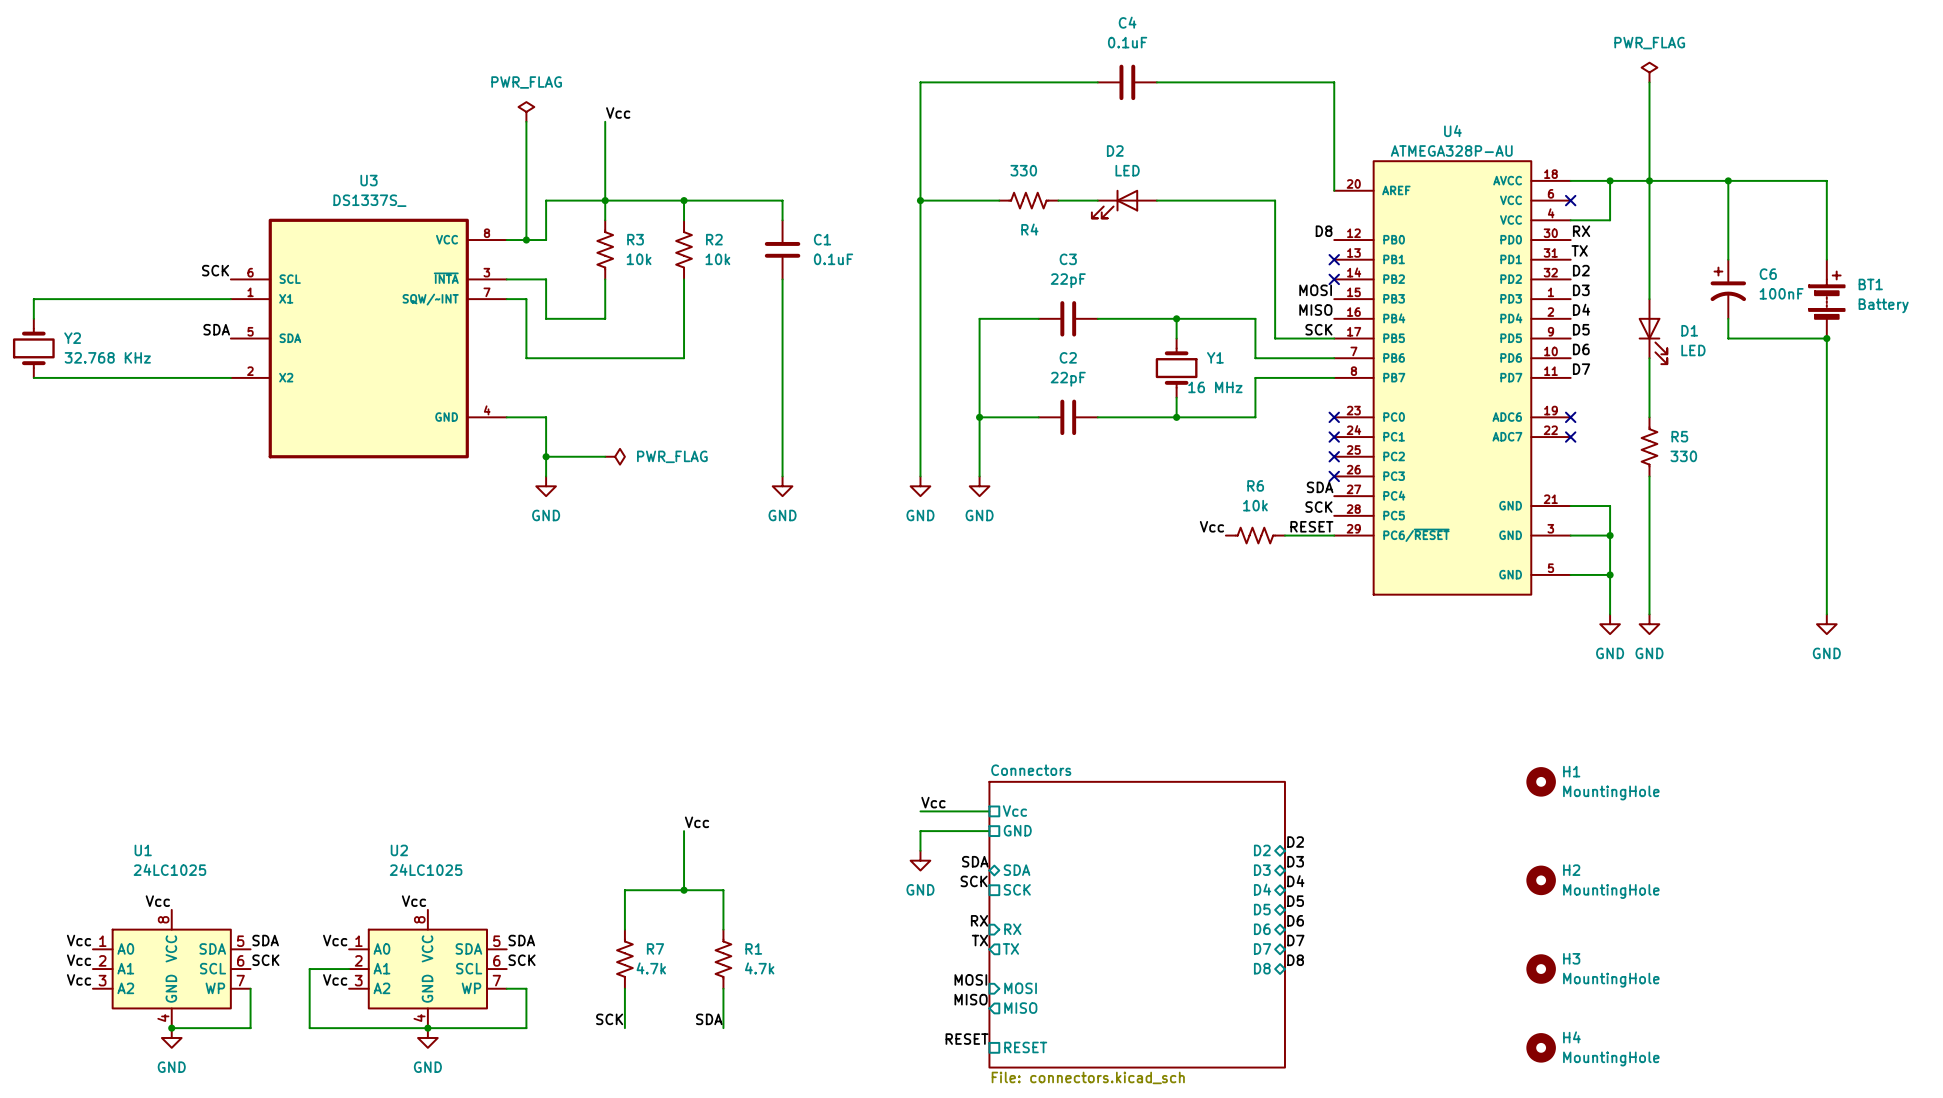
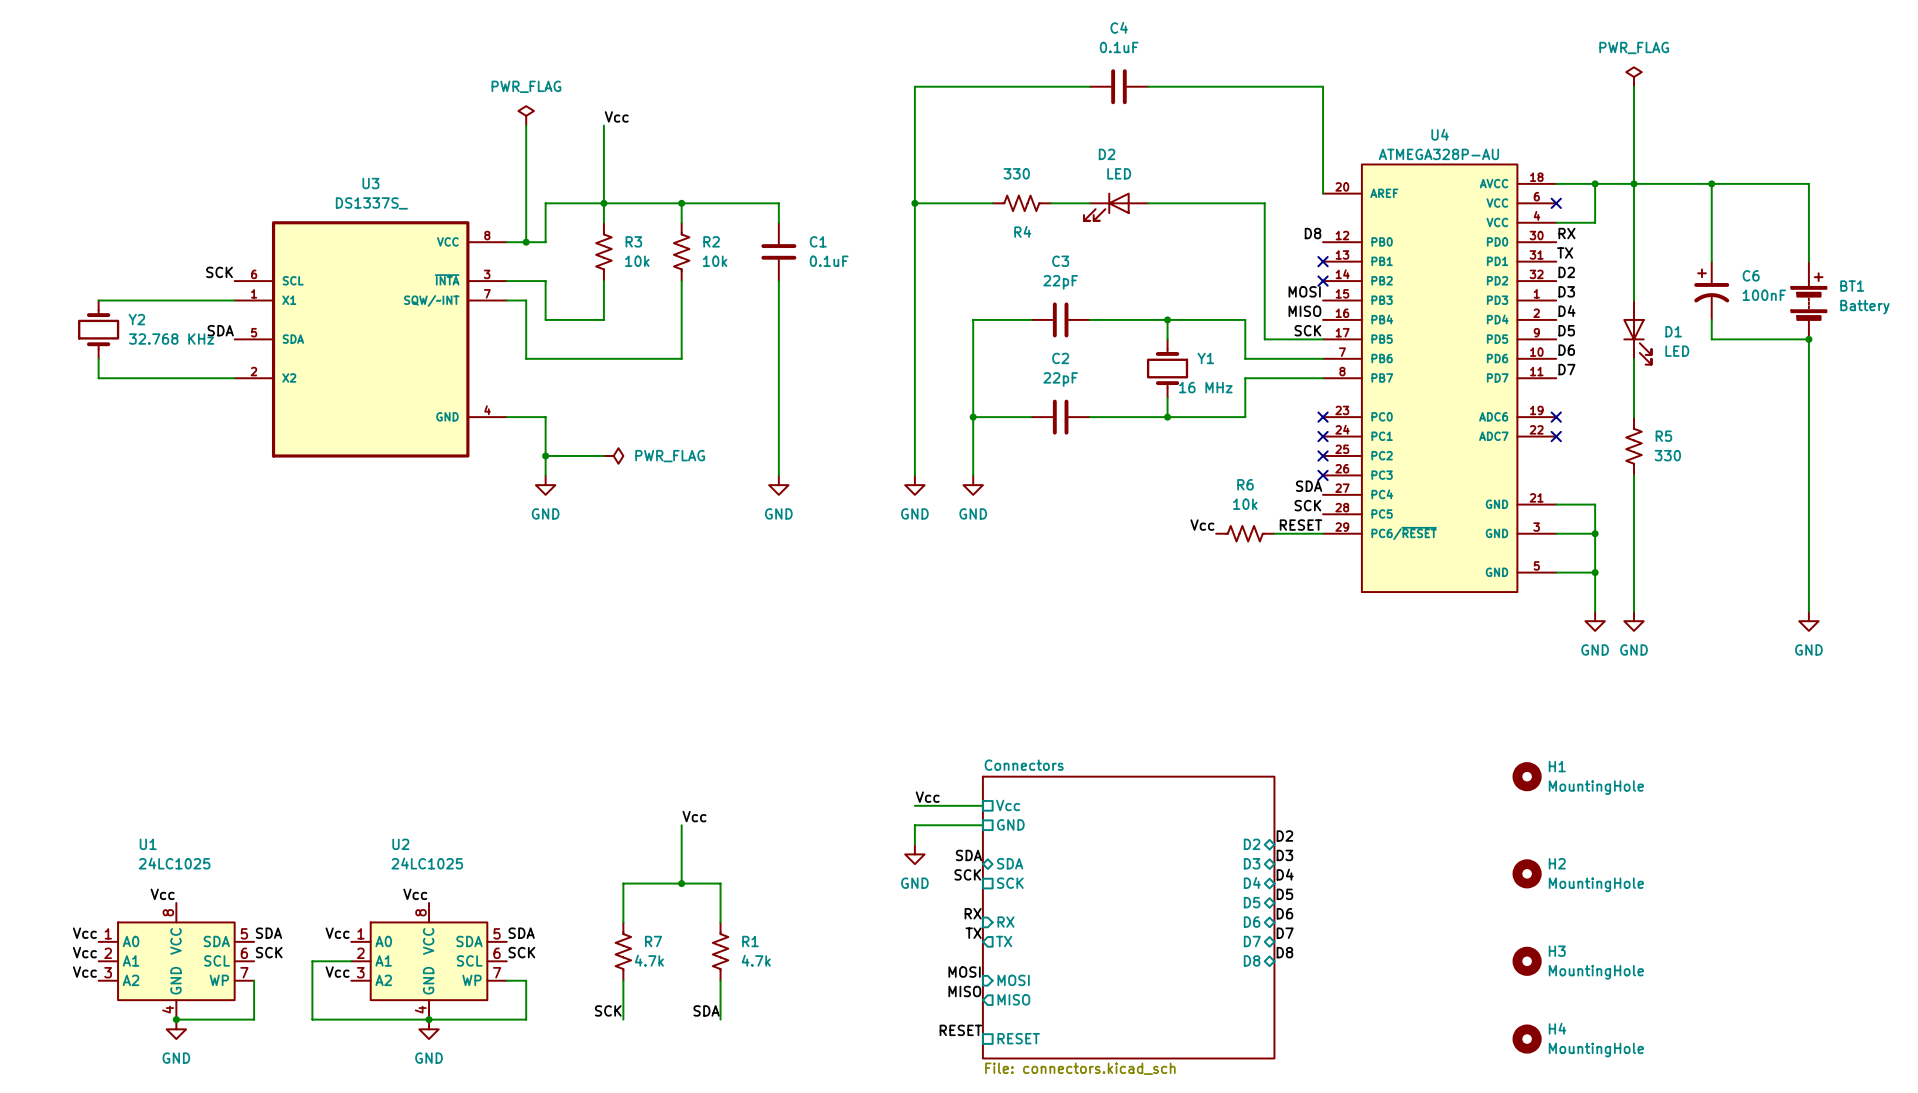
wire: (92, 299) (33, 299) (33, 318) -> none
Y2 position: (33, 348) -> (98, 329)
wire: (33, 377) (92, 377) -> (98, 358) (98, 378)

